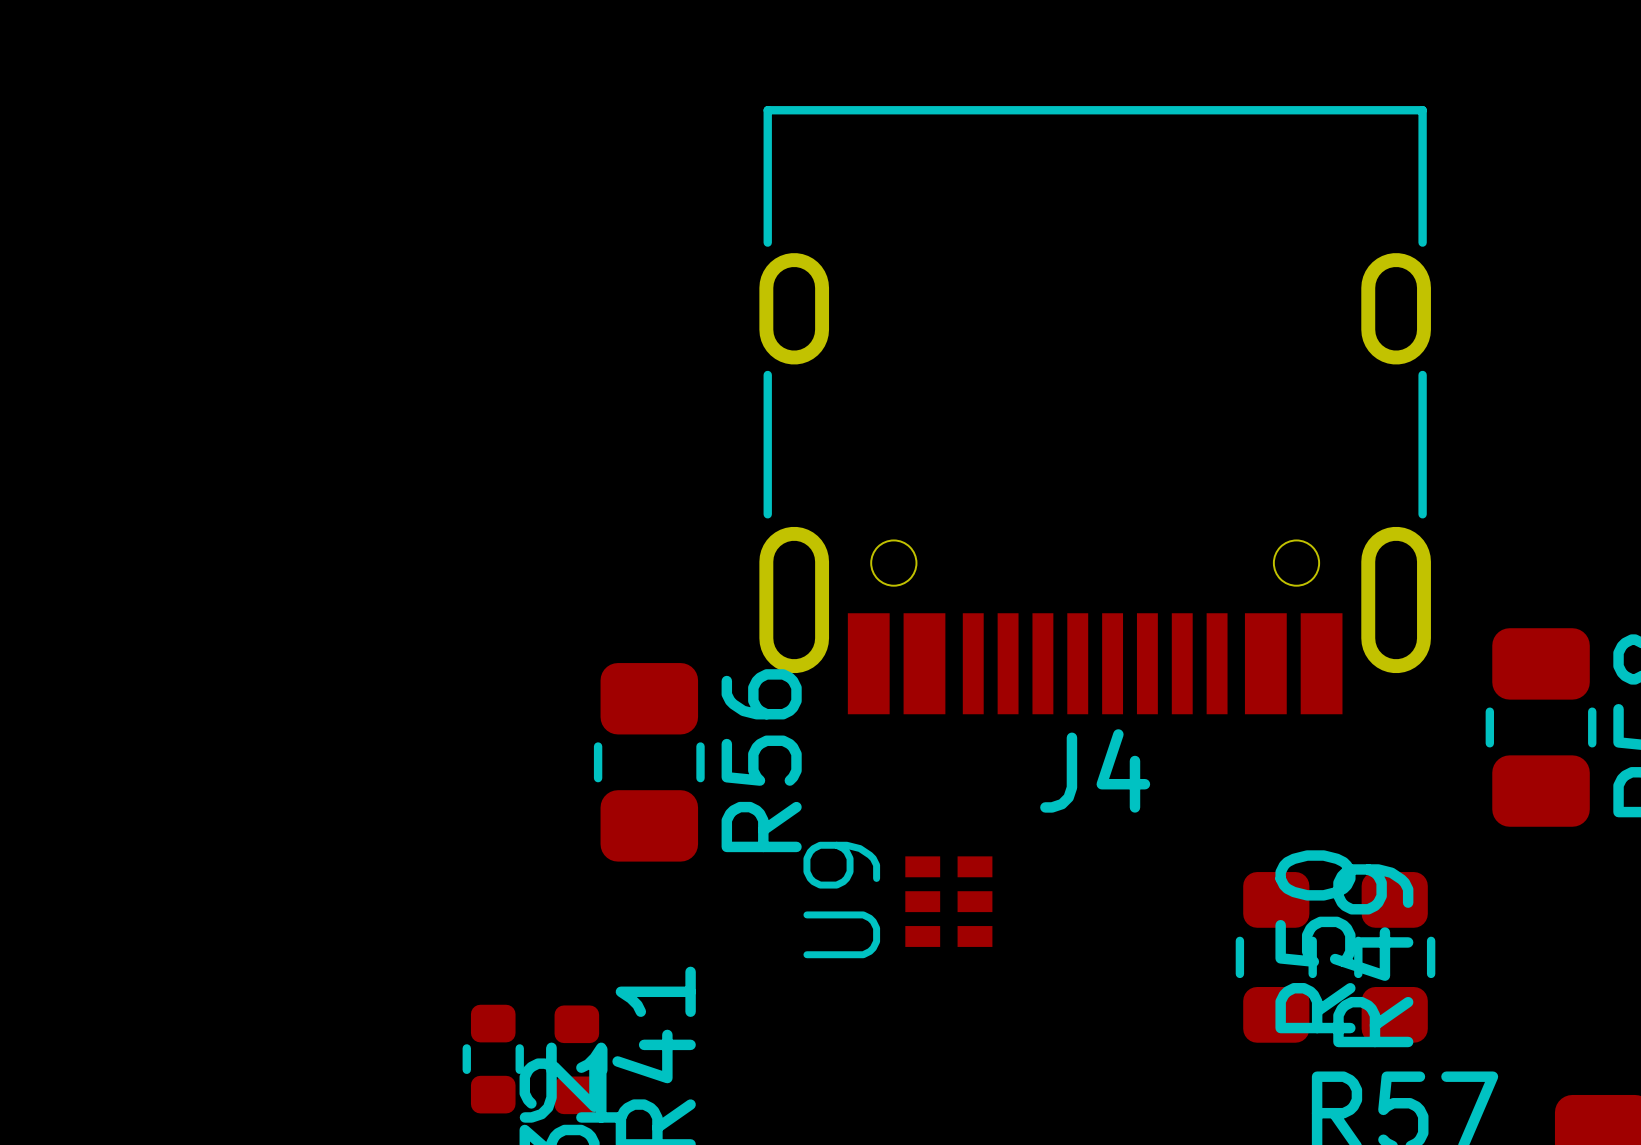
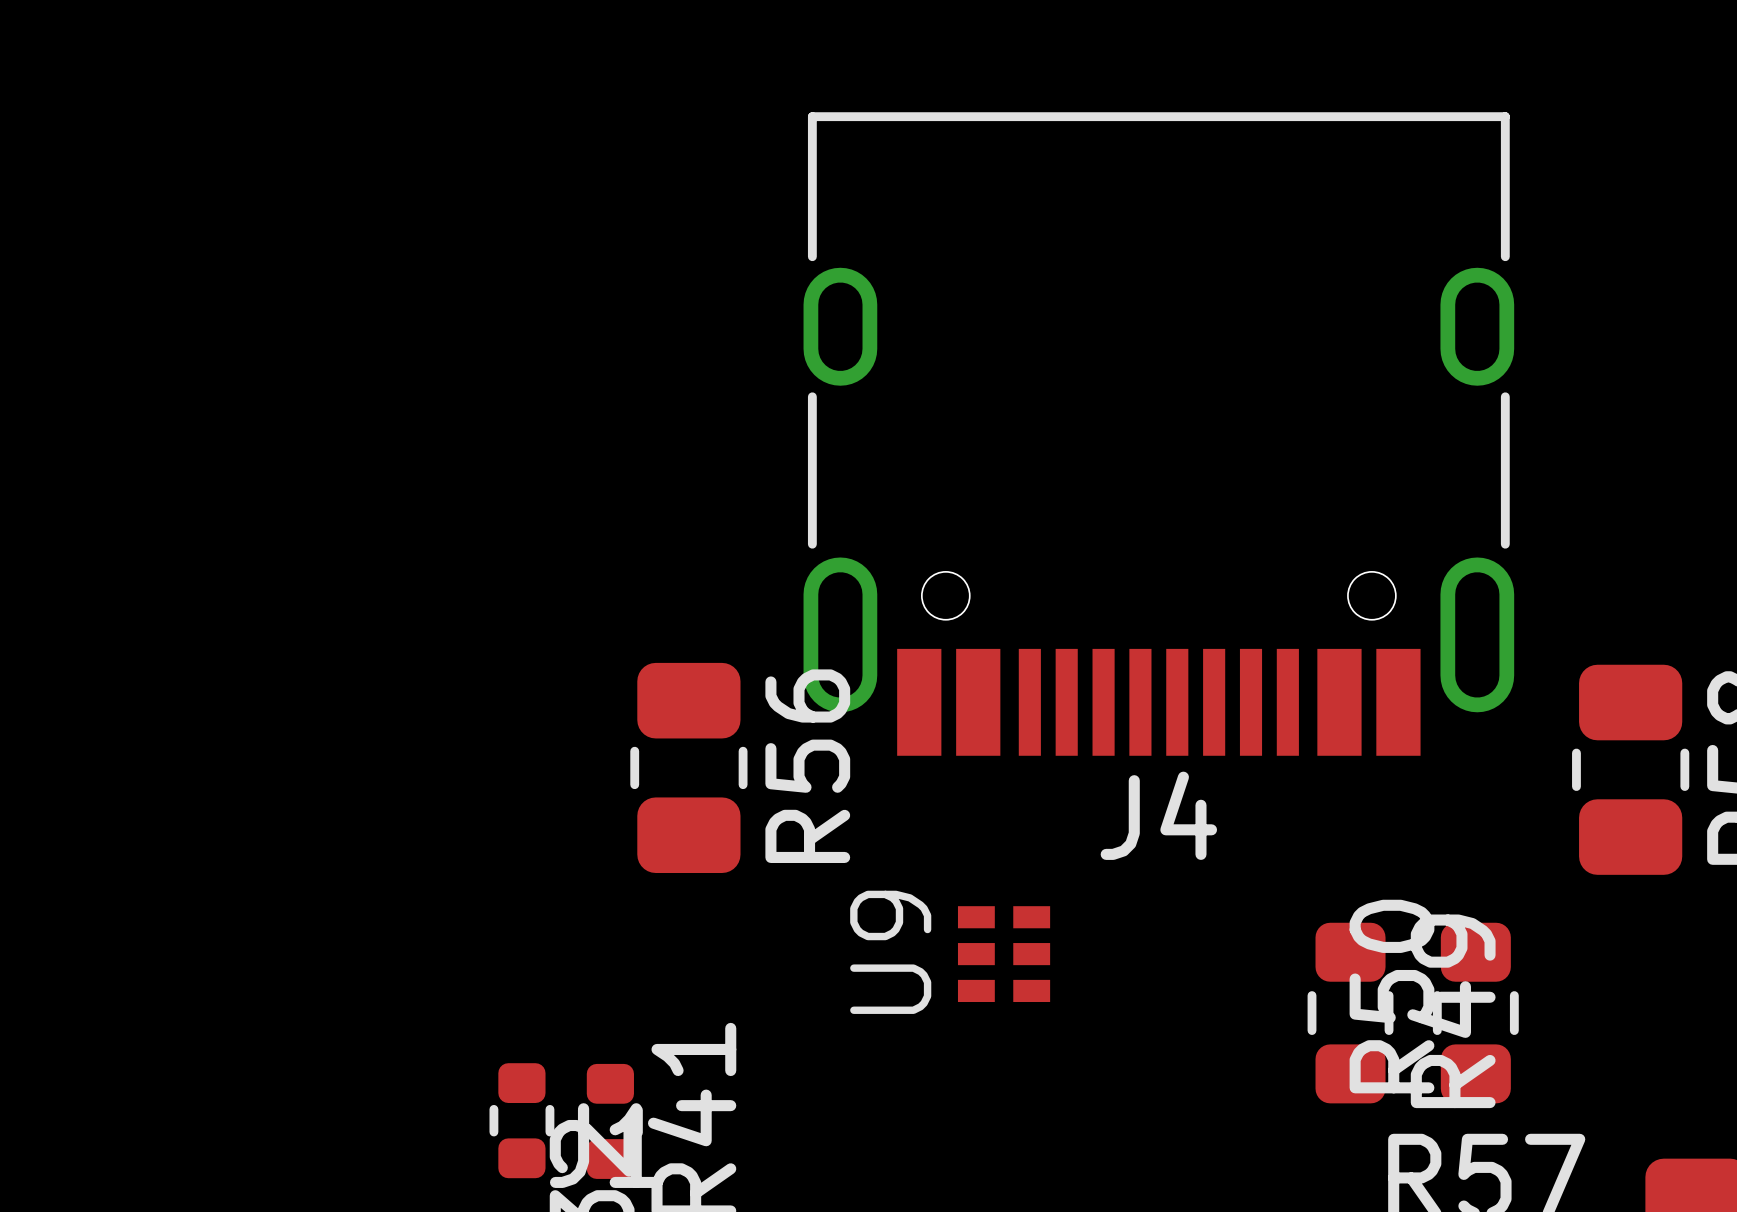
R56 position: (649, 762) -> (688, 767)

